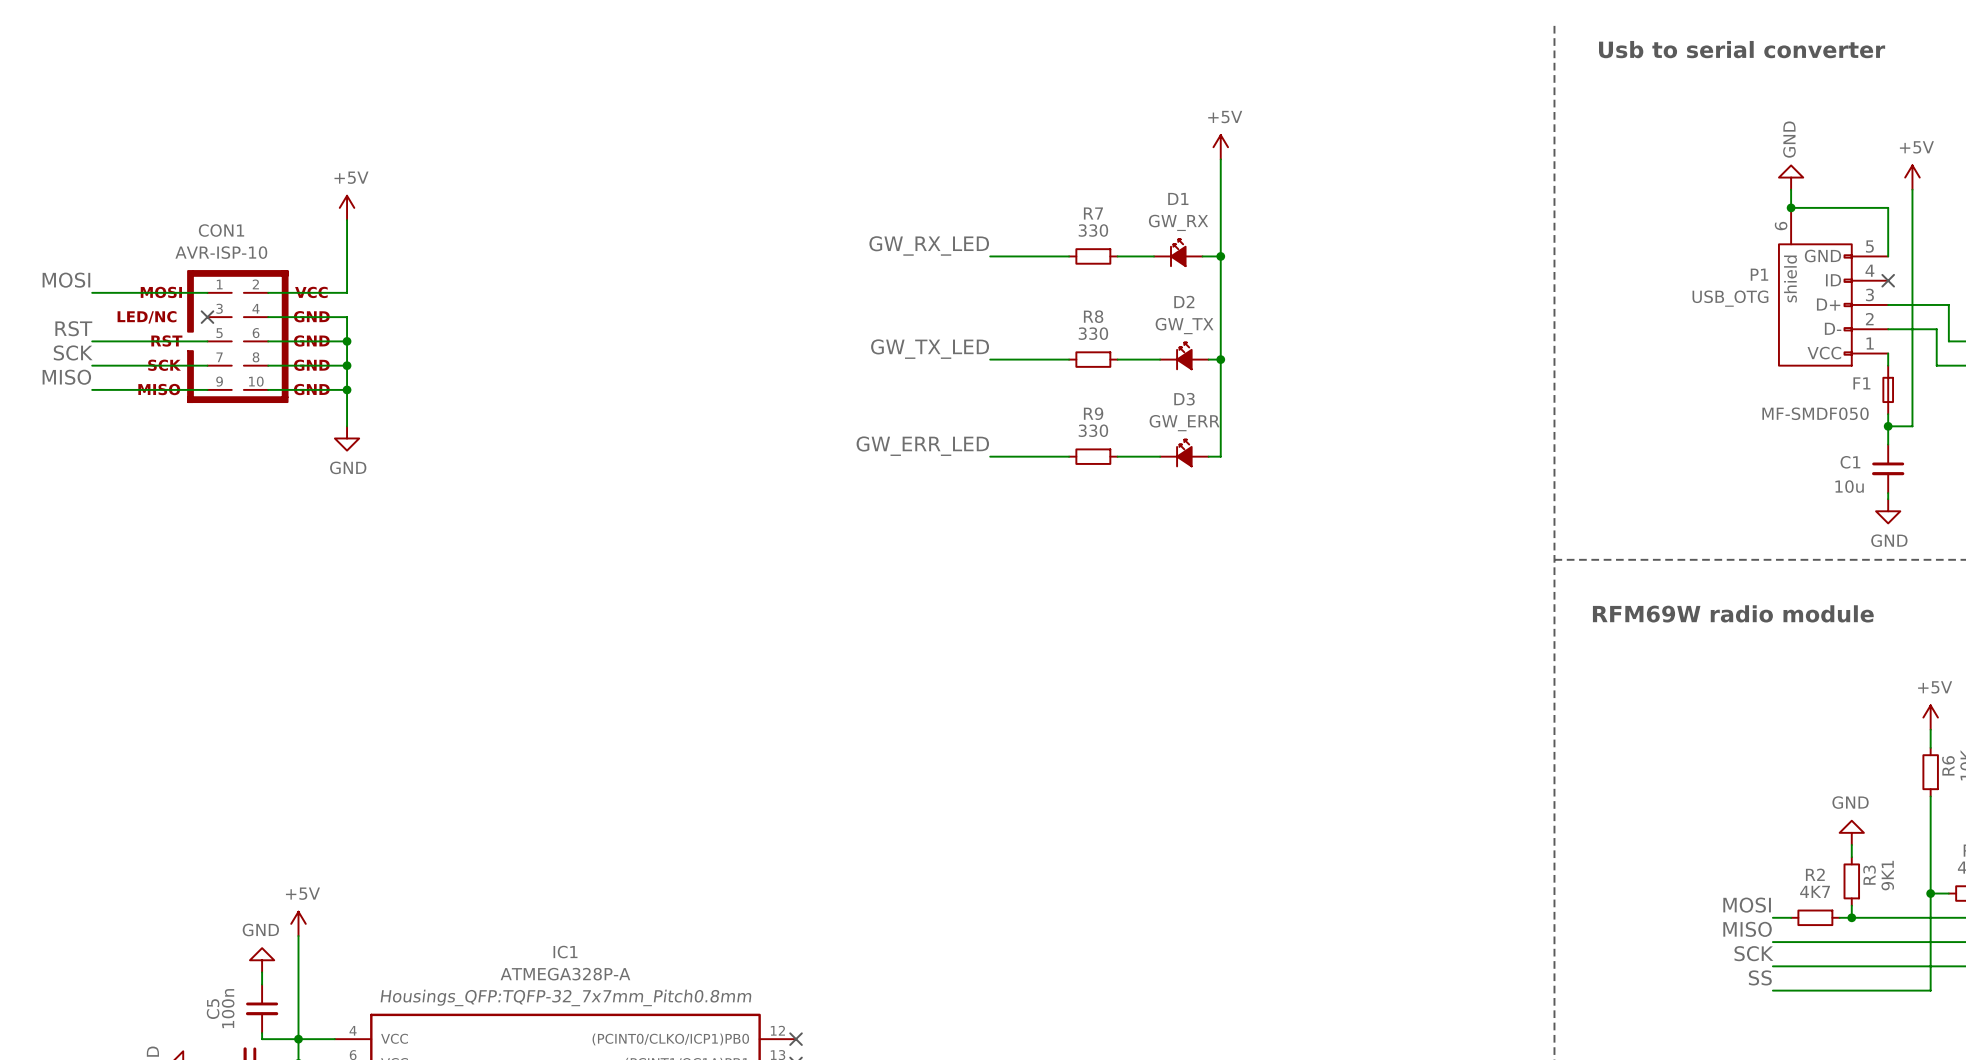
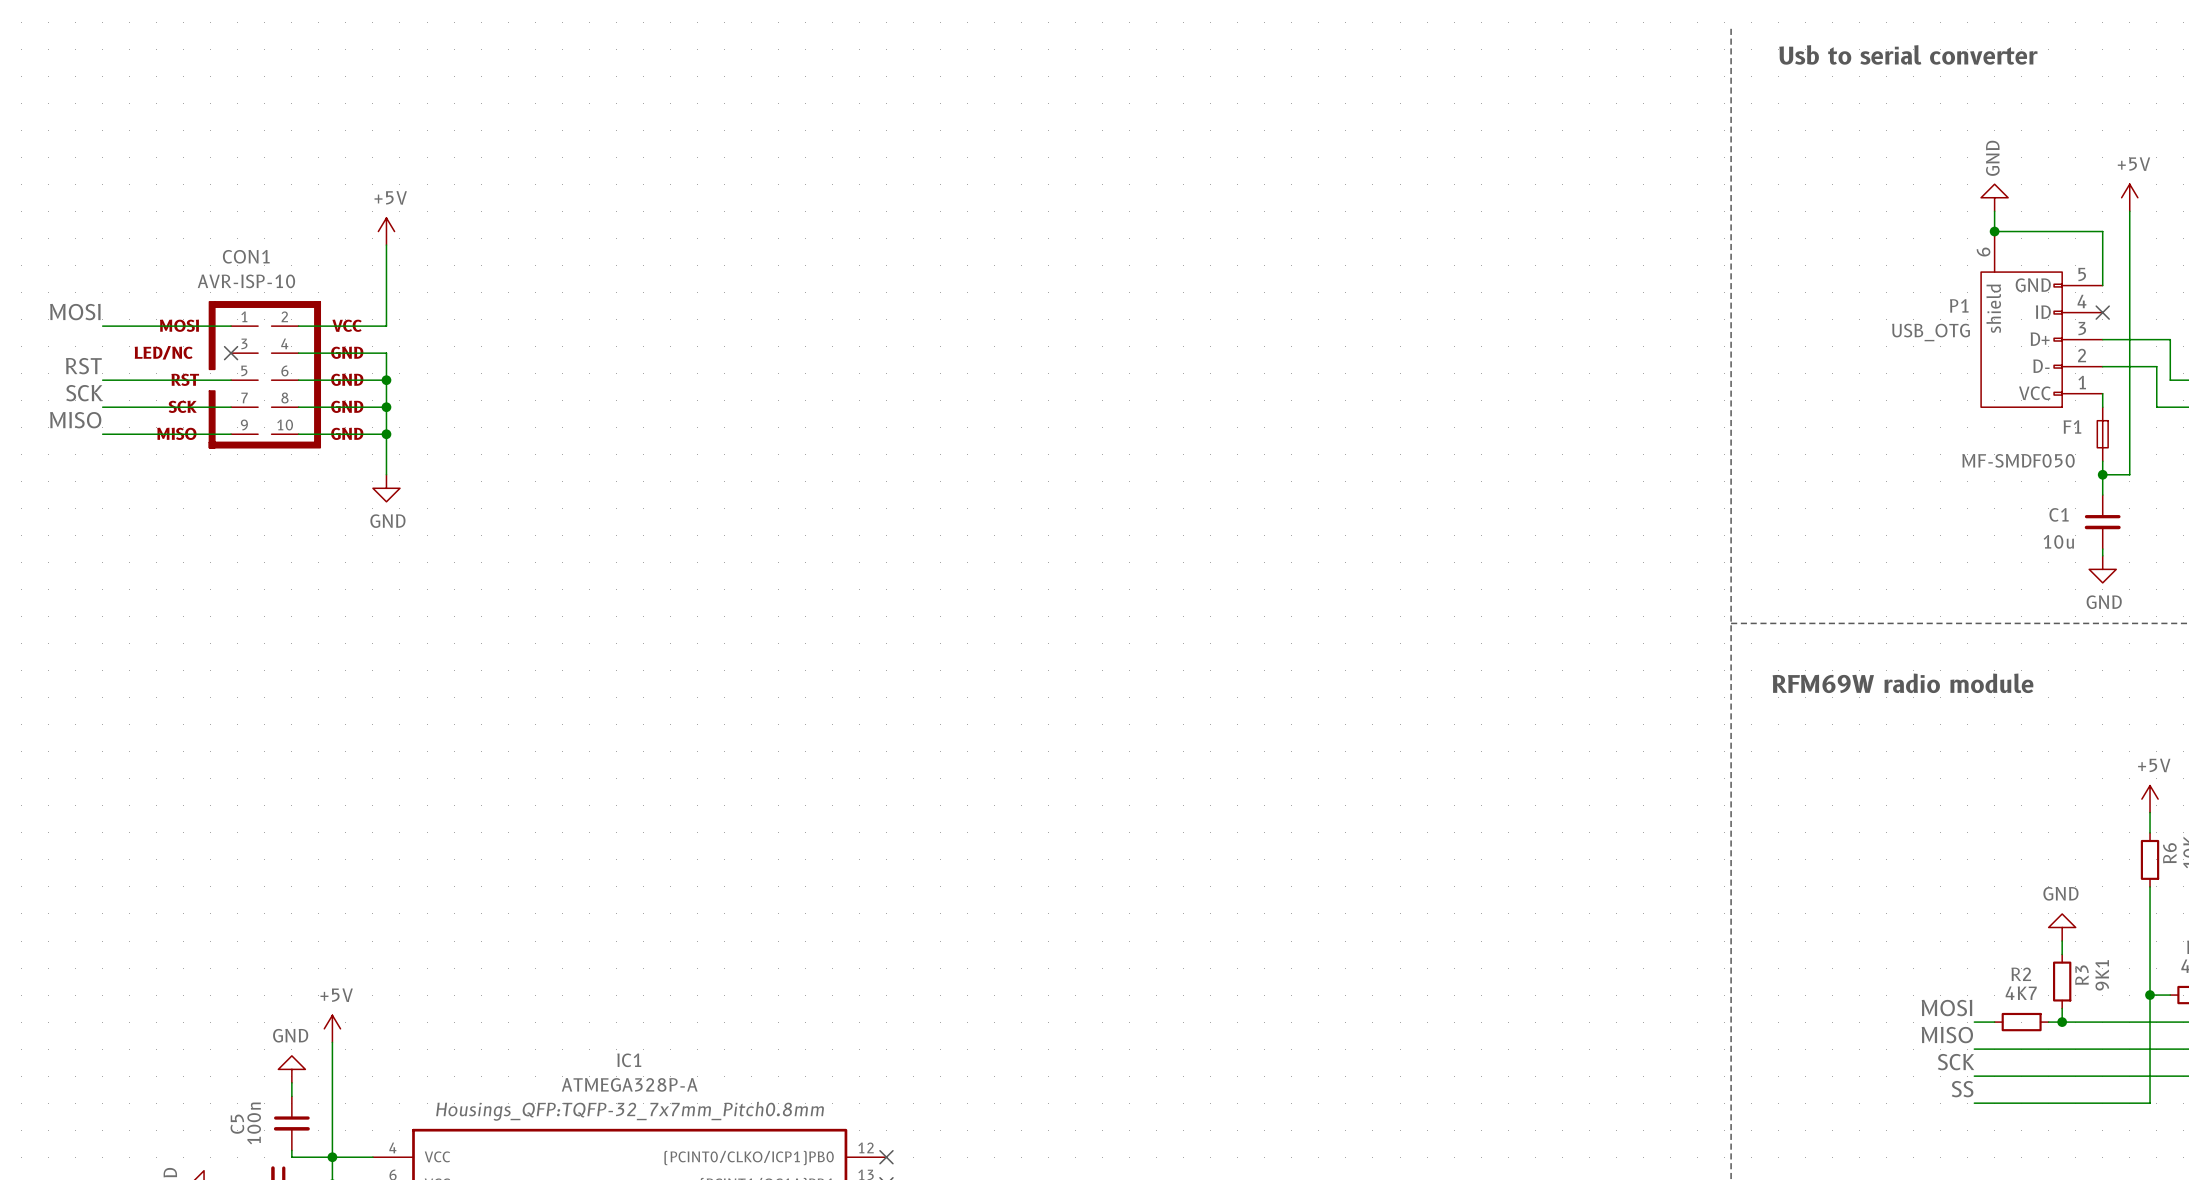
power symbol: +5V (1220, 147) -> none
wire: (1220, 159) (1220, 456) (1208, 456) -> none
label: GW_RX_LED (929, 245) -> none
D1: GW_RX (1178, 252) -> none
wire: (990, 256) (1069, 256) -> none
R7: 330 (1093, 256) -> none
wire: (1117, 256) (1154, 256) -> none
wire: (1202, 256) (1220, 256) -> none
junction: (1220, 256) -> none
label: GW_TX_LED (930, 349) -> none
D2: GW_TX (1184, 355) -> none
wire: (990, 359) (1069, 359) -> none
R8: 330 (1093, 359) -> none
wire: (1117, 359) (1160, 359) -> none
wire: (1208, 359) (1220, 359) -> none
junction: (1220, 359) -> none
label: GW_ERR_LED (922, 446) -> none
D3: GW_ERR (1184, 453) -> none
wire: (990, 456) (1069, 456) -> none
R9: 330 (1093, 456) -> none
wire: (1117, 456) (1160, 456) -> none

